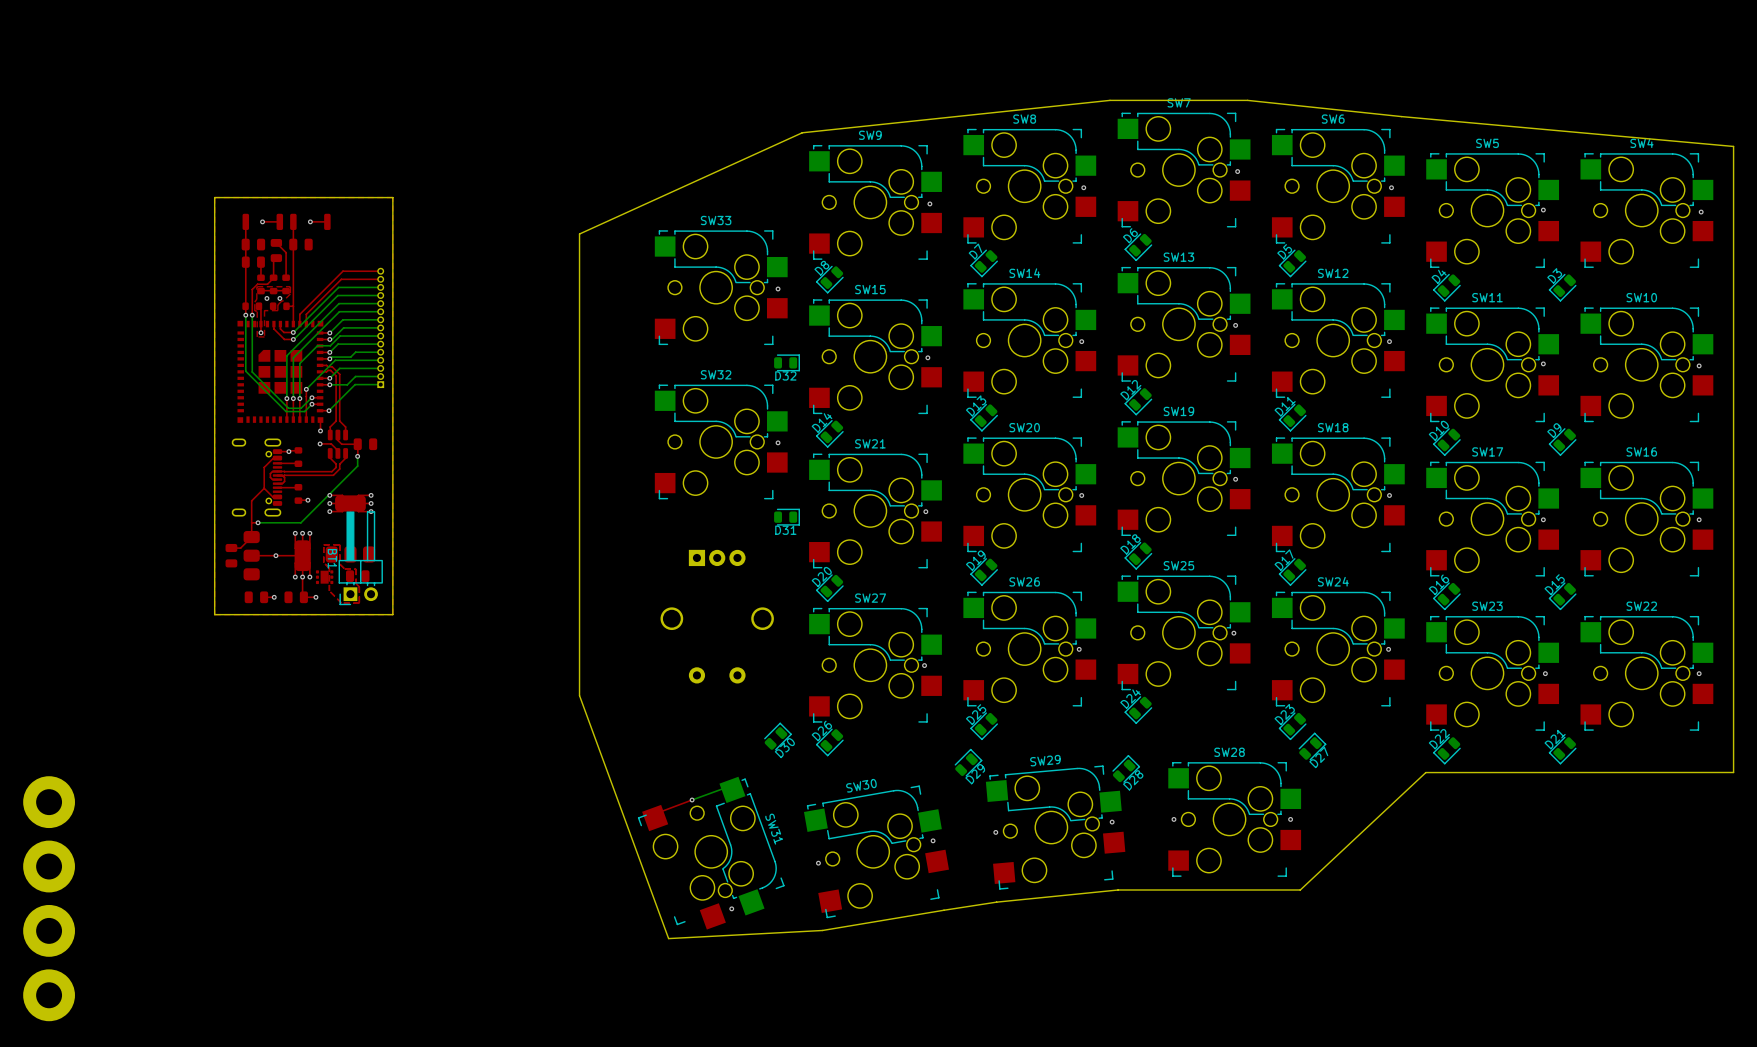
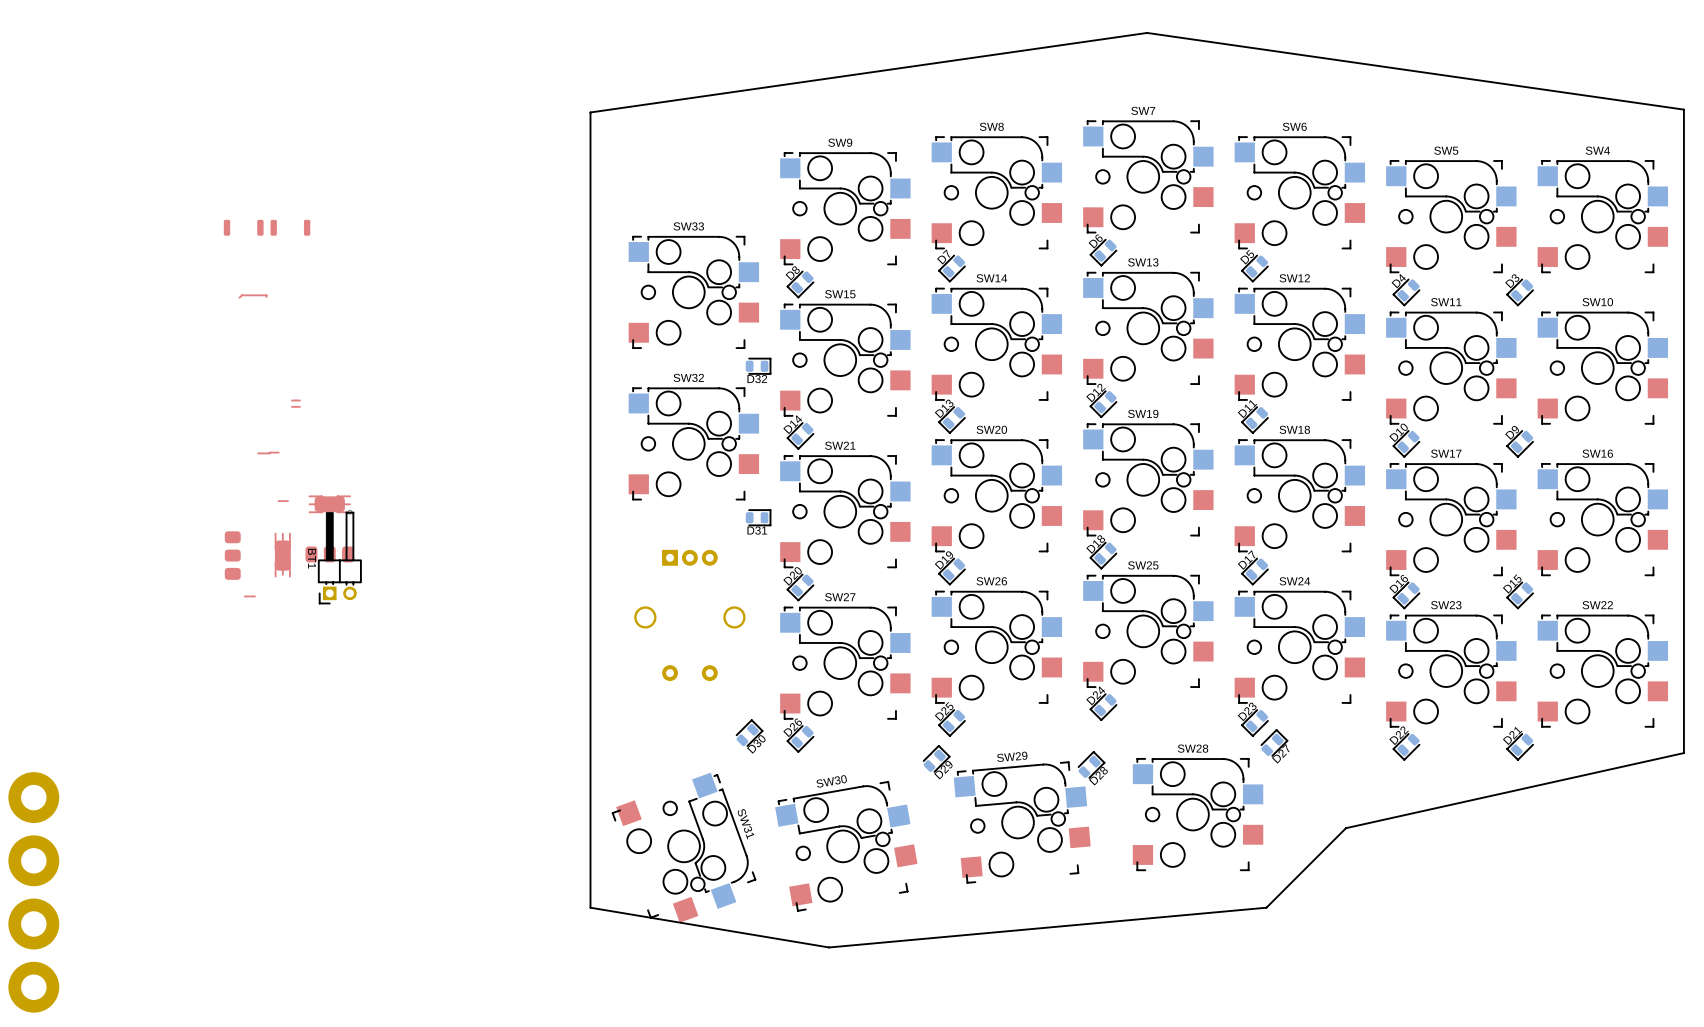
board edge: (1247, 100) (1401, 116) (1733, 146) (1733, 772) (1425, 772) (1300, 890) (1118, 890) (996, 902) (822, 930) (668, 938) (579, 695) (579, 234) (802, 132) (1109, 100) (1247, 100) -> (1147, 32) (1683, 109) (1683, 753) (1345, 828) (1266, 907) (829, 947) (590, 907) (590, 112) (1147, 32)
via: (1237, 171) -> none
via: (1083, 187) -> none
via: (1391, 187) -> none
board edge: (392, 197) (214, 197) (214, 614) (392, 614) (392, 197) -> none
via: (929, 203) -> none
via: (1543, 210) -> none
via: (1701, 212) -> none
top track: (245, 221) (245, 315) -> none
via: (262, 221) -> none
top track: (279, 221) (262, 221) -> none
top track: (293, 221) (293, 324) -> none
via: (310, 221) -> none
top track: (327, 221) (310, 221) -> none
top track: (276, 242) (286, 252) (286, 278) -> none
part: (253, 244) -> none
part: (300, 244) -> none
part: (276, 250) -> none
top track: (276, 258) (273, 260) (273, 278) (267, 284) (257, 284) (252, 289) (252, 315) -> none
part: (253, 262) -> none
top track: (260, 262) (260, 278) -> none
top track: (380, 271) (342, 271) (299, 314) (299, 324) -> none
top track: (380, 279) (341, 279) (306, 314) (306, 324) -> none
part: (260, 284) -> none
part: (273, 284) -> none
part: (286, 284) -> none
top zone outline: (290, 286) (256, 287) (254, 311) (257, 311) (257, 336) (264, 336) (264, 310) (277, 310) (277, 304) (290, 294) (290, 286) -> none
bottom track: (380, 287) (338, 287) (293, 332) -> none
via: (778, 288) -> none
bottom track: (380, 295) (337, 295) (293, 339) -> none
via: (266, 298) -> none
via: (279, 298) -> none
bottom track: (380, 303) (339, 303) (286, 355) (286, 398) -> none
part: (252, 306) -> none
part: (279, 306) -> none
top track: (293, 306) (286, 306) -> none
top track: (260, 309) (260, 332) -> none
bottom track: (380, 311) (339, 311) (293, 357) (293, 398) -> none
bottom track: (245, 315) (245, 371) (286, 411) (304, 411) (312, 404) -> none
via: (245, 315) -> none
bottom track: (252, 315) (252, 372) (288, 408) (301, 408) (312, 397) -> none
via: (252, 315) -> none
bottom track: (380, 319) (342, 319) (329, 332) -> none
top track: (273, 324) (273, 328) (284, 339) (293, 339) -> none
top track: (280, 324) (280, 328) (283, 332) (293, 332) -> none
via: (1235, 325) -> none
bottom track: (380, 327) (343, 327) (329, 339) -> none
part: (380, 327) -> none
via: (260, 332) -> none
via: (293, 332) -> none
top track: (329, 332) (320, 332) -> none
via: (329, 332) -> none
bottom track: (380, 336) (340, 336) (330, 345) (317, 345) (299, 363) (299, 398) -> none
via: (293, 339) -> none
top track: (329, 339) (320, 339) -> none
via: (329, 339) -> none
via: (1081, 341) -> none
via: (1389, 341) -> none
bottom track: (380, 344) (338, 344) (329, 352) -> none
top track: (329, 352) (320, 352) -> none
via: (329, 352) -> none
bottom track: (380, 352) (355, 352) (350, 357) (331, 357) (329, 358) -> none
via: (927, 357) -> none
top track: (329, 358) (320, 358) -> none
via: (329, 358) -> none
bottom track: (380, 360) (335, 360) (306, 389) -> none
via: (1543, 363) -> none
top track: (320, 365) (332, 366) (339, 374) (339, 421) (345, 426) (345, 435) -> none
via: (1699, 365) -> none
bottom track: (380, 368) (339, 368) (329, 378) -> none
part: (280, 371) -> none
top track: (320, 371) (330, 370) (336, 375) (336, 421) (330, 426) (330, 435) -> none
bottom track: (380, 376) (355, 376) (347, 384) (329, 384) -> none
top track: (329, 378) (320, 378) -> none
via: (329, 378) -> none
top track: (329, 384) (320, 384) -> none
via: (329, 384) -> none
bottom track: (380, 384) (355, 384) (329, 410) -> none
top track: (306, 389) (306, 396) -> none
via: (306, 389) -> none
top track: (306, 396) (306, 419) -> none
via: (312, 397) -> none
top track: (286, 398) (286, 419) -> none
via: (286, 398) -> none
top track: (293, 398) (293, 419) -> none
via: (293, 398) -> none
top track: (299, 398) (299, 419) -> none
via: (299, 398) -> none
via: (312, 404) -> none
top track: (329, 410) (320, 410) -> none
via: (329, 410) -> none
top track: (320, 420) (320, 430) -> none
via: (320, 430) -> none
top track: (337, 435) (337, 440) (341, 444) (357, 444) (357, 456) -> none
via: (778, 442) -> none
top track: (320, 443) (331, 443) (337, 450) (337, 453) -> none
via: (320, 443) -> none
part: (337, 444) -> none
part: (365, 444) -> none
via: (288, 451) -> none
top track: (330, 453) (330, 458) (336, 463) (336, 467) (331, 471) (272, 471) (270, 477) (277, 479) -> none
top track: (345, 453) (345, 458) (339, 464) (339, 468) (333, 475) (277, 475) -> none
bottom track: (357, 456) (357, 466) (300, 522) (258, 522) -> none
via: (357, 456) -> none
part: (298, 457) -> none
top track: (277, 458) (273, 458) (264, 467) (264, 488) -> none
top track: (298, 463) (277, 463) -> none
top track: (282, 475) (284, 481) (277, 483) -> none
part: (256, 477) -> none
via: (1235, 479) -> none
top track: (298, 487) (277, 487) -> none
top track: (264, 488) (272, 496) (277, 496) -> none
top track: (264, 488) (251, 500) (251, 537) (240, 548) (231, 548) -> none
part: (298, 493) -> none
via: (329, 495) -> none
via: (371, 495) -> none
via: (1081, 495) -> none
via: (1389, 495) -> none
via: (307, 500) -> none
via: (329, 503) -> none
via: (371, 503) -> none
via: (329, 511) -> none
via: (925, 511) -> none
via: (1543, 519) -> none
via: (1699, 519) -> none
top track: (258, 522) (251, 522) -> none
via: (258, 522) -> none
via: (295, 533) -> none
via: (302, 533) -> none
via: (309, 533) -> none
top zone outline: (339, 544) (323, 544) (323, 562) (329, 568) (329, 590) (341, 603) (359, 603) (359, 586) (356, 583) (356, 569) (344, 569) (339, 564) (339, 544) -> none
part: (231, 555) -> none
via: (275, 555) -> none
top track: (302, 555) (251, 555) -> none
top track: (302, 575) (302, 596) (315, 597) -> none
part: (357, 576) -> none
via: (295, 577) -> none
via: (302, 577) -> none
via: (309, 577) -> none
part: (324, 577) -> none
part: (256, 597) -> none
via: (274, 597) -> none
part: (296, 597) -> none
via: (315, 597) -> none
via: (1233, 633) -> none
via: (1079, 649) -> none
via: (1388, 649) -> none
via: (924, 665) -> none
via: (1545, 673) -> none
via: (1699, 673) -> none
bottom track: (730, 785) (692, 800) -> none
top track: (692, 800) (653, 814) -> none
via: (692, 800) -> none
via: (1173, 819) -> none
via: (1290, 819) -> none
via: (1112, 822) -> none
via: (995, 832) -> none
via: (933, 840) -> none
via: (818, 863) -> none
via: (731, 908) -> none

